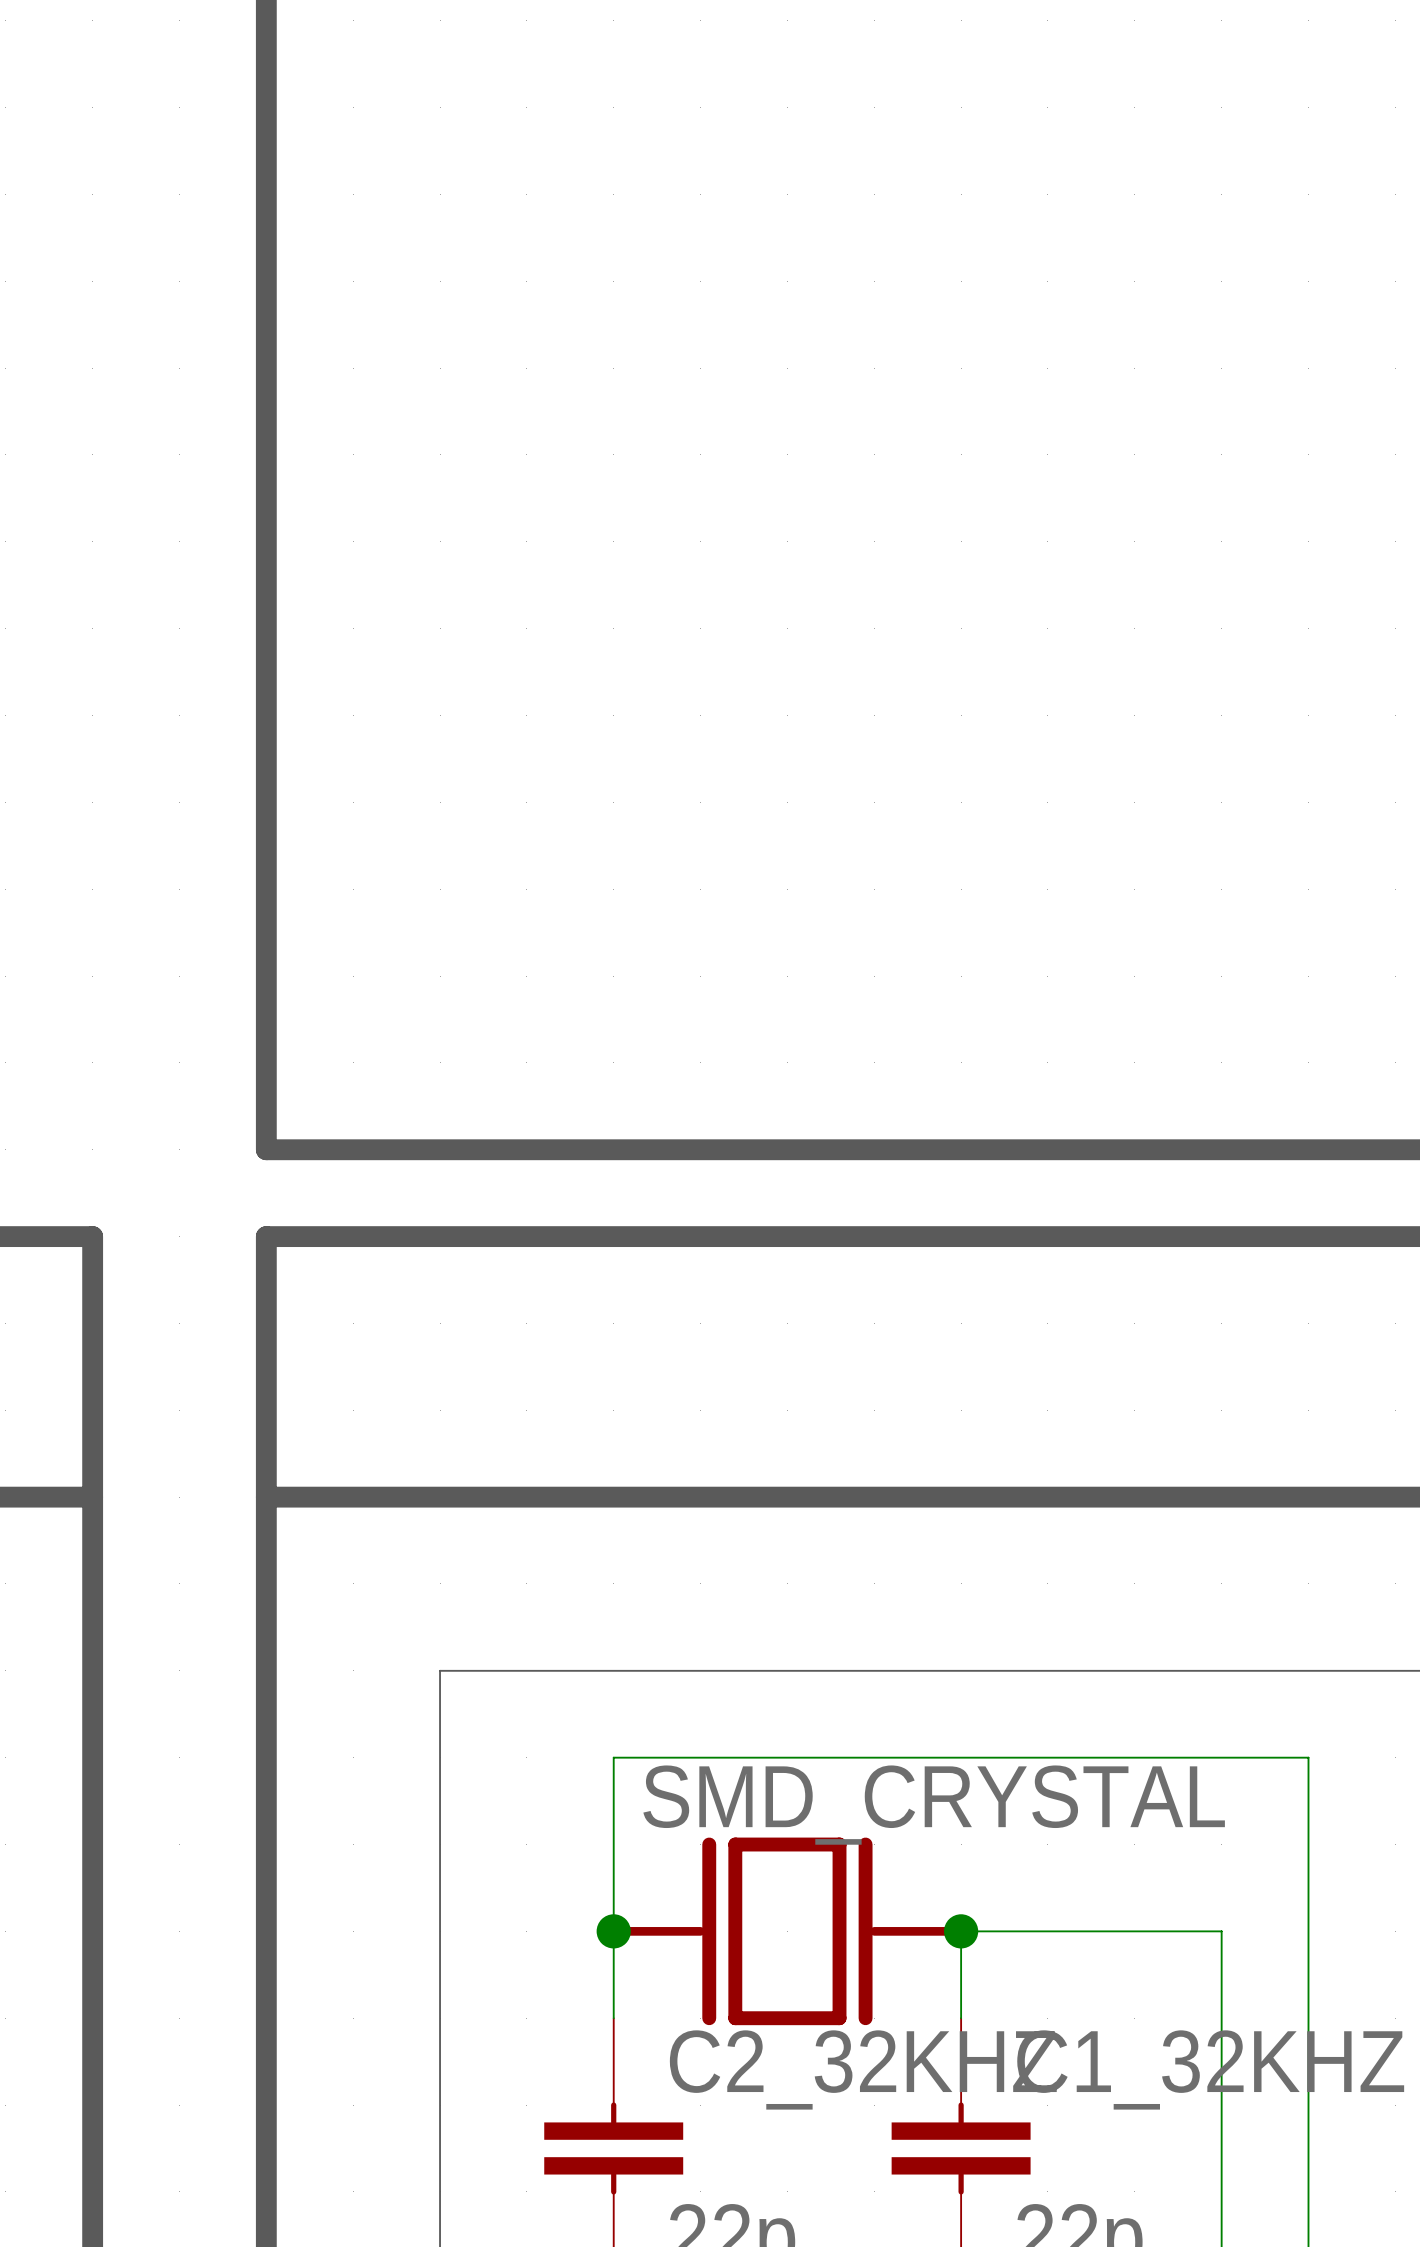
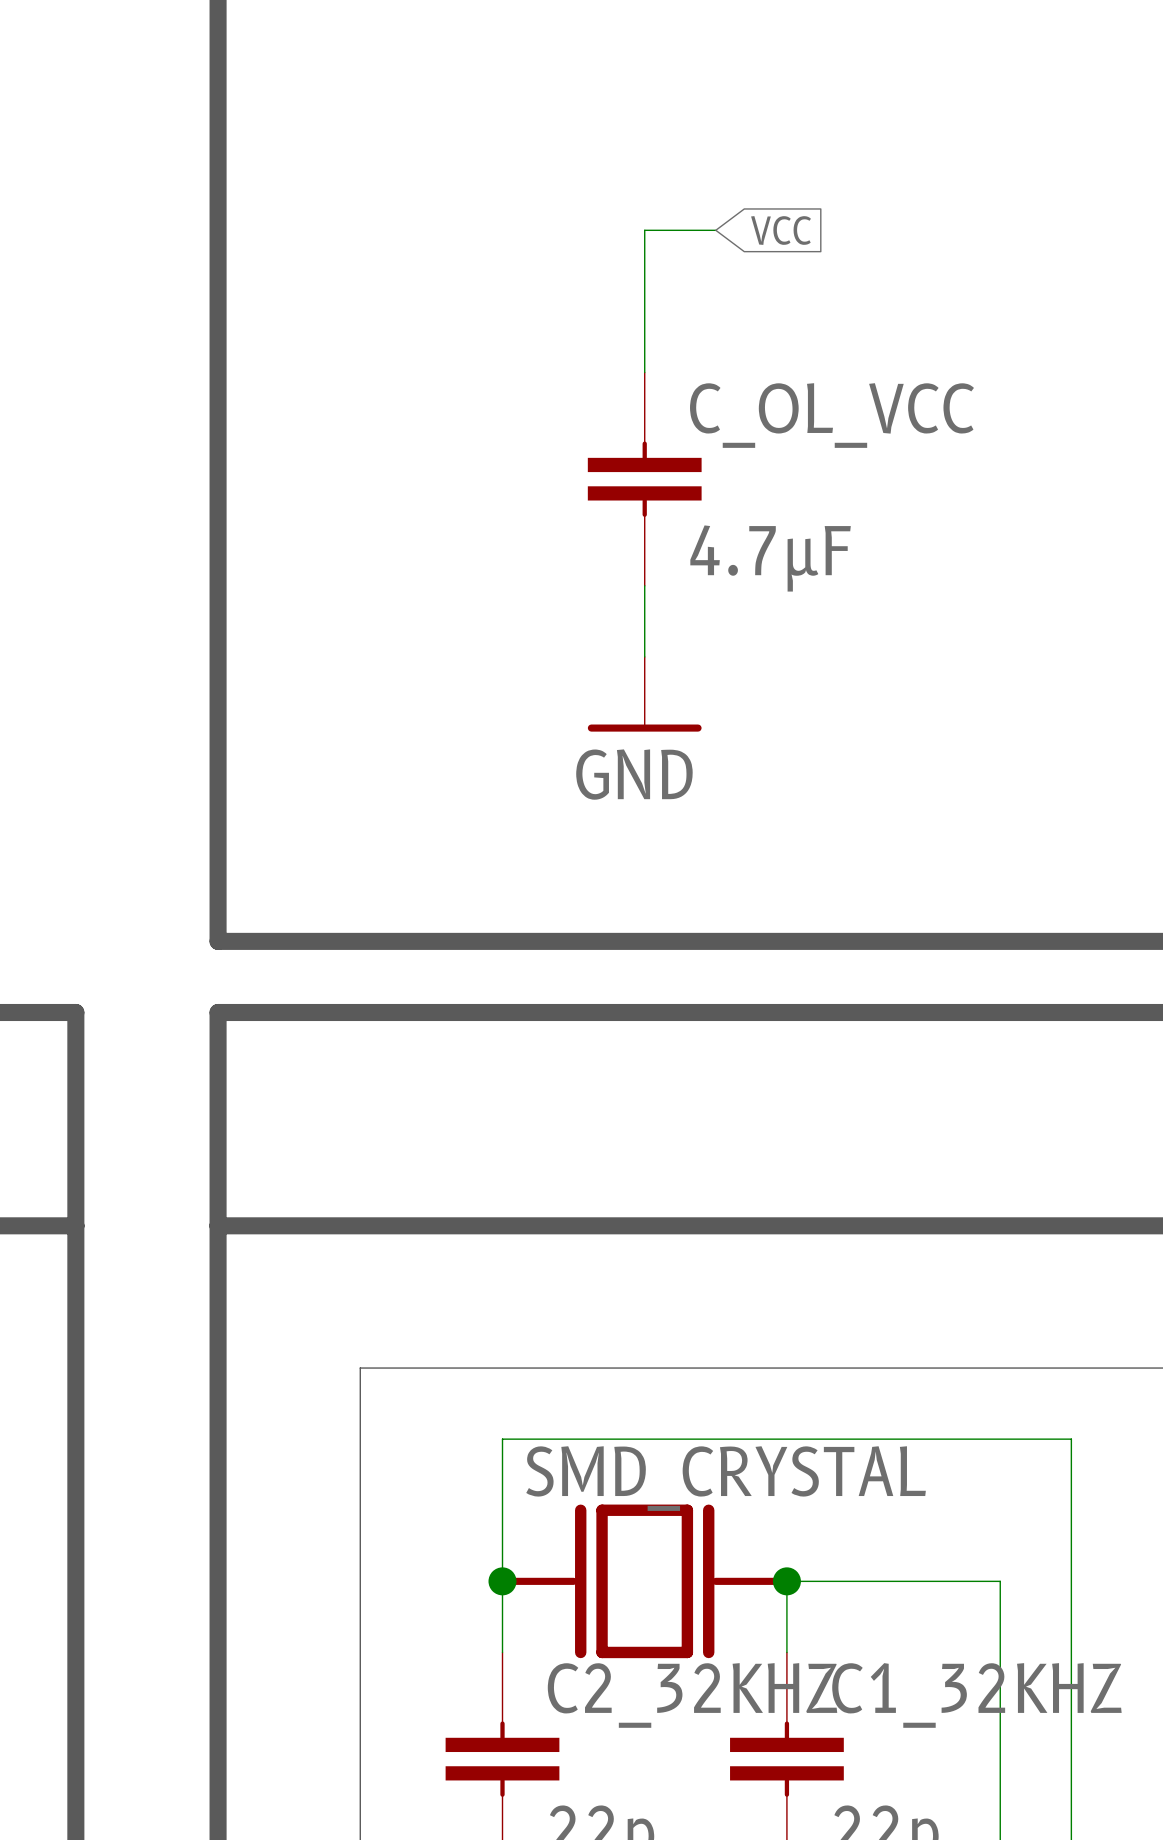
wire: none -> (715, 230) (644, 230) (644, 372)
global label: none -> VCC (781, 230)
C_OL_VCC: none -> 4.7µF (644, 479)
wire: none -> (644, 585) (644, 656)
power symbol: none -> GND (644, 694)

